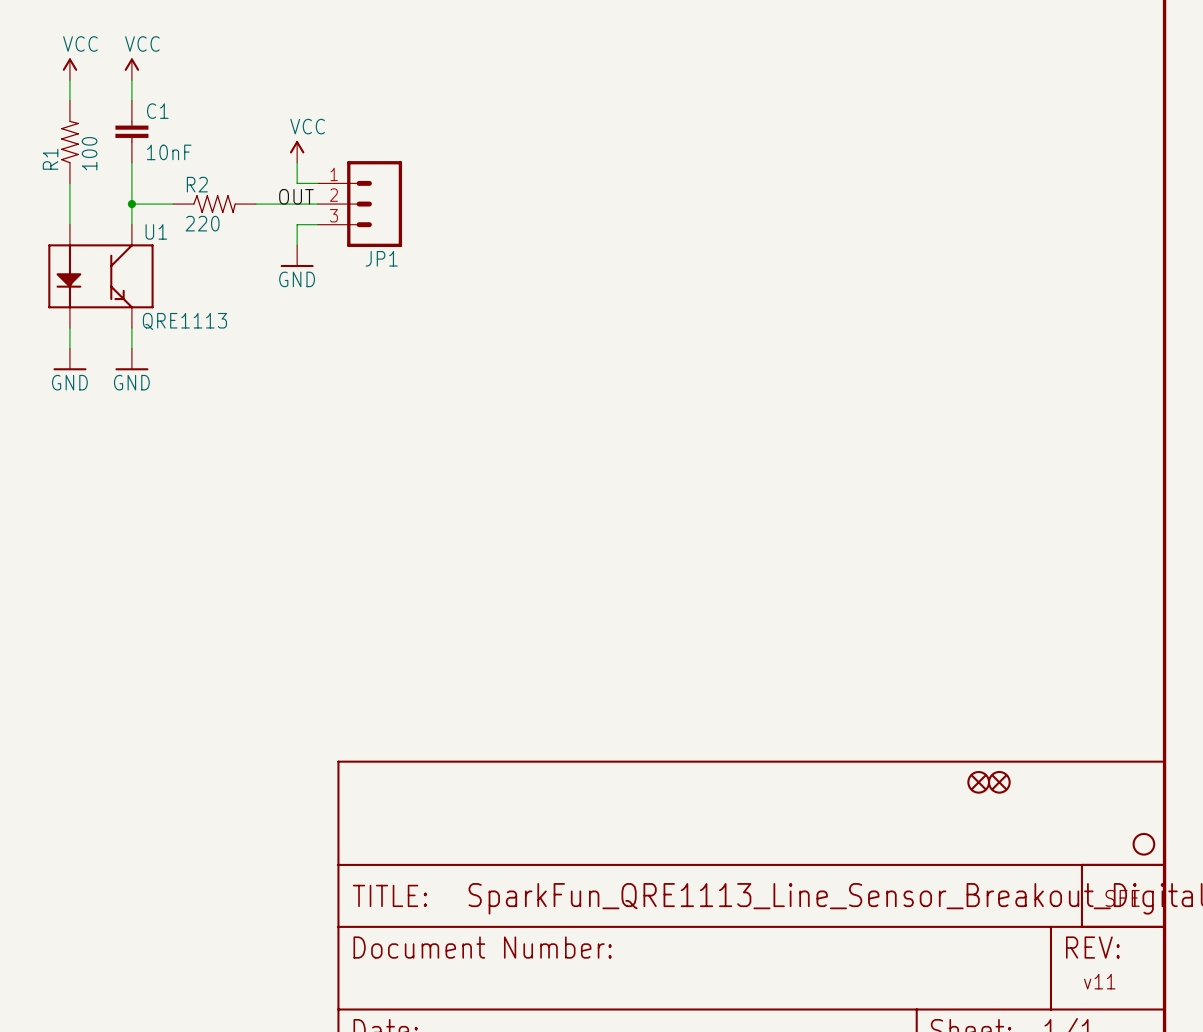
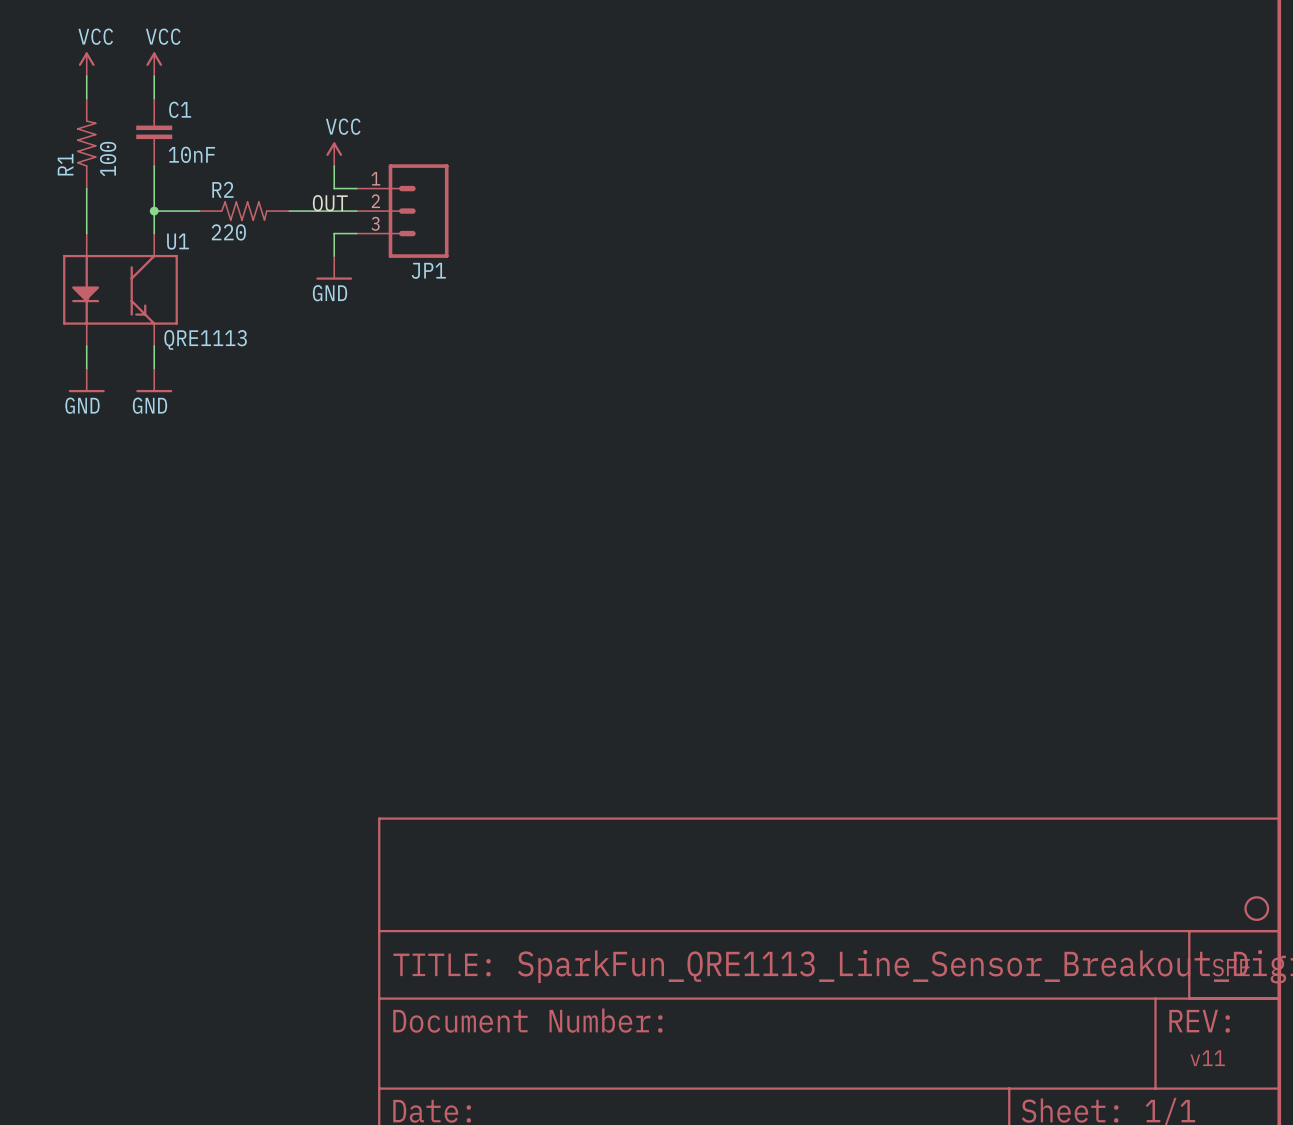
part: (978, 782) -> none
part: (999, 782) -> none

